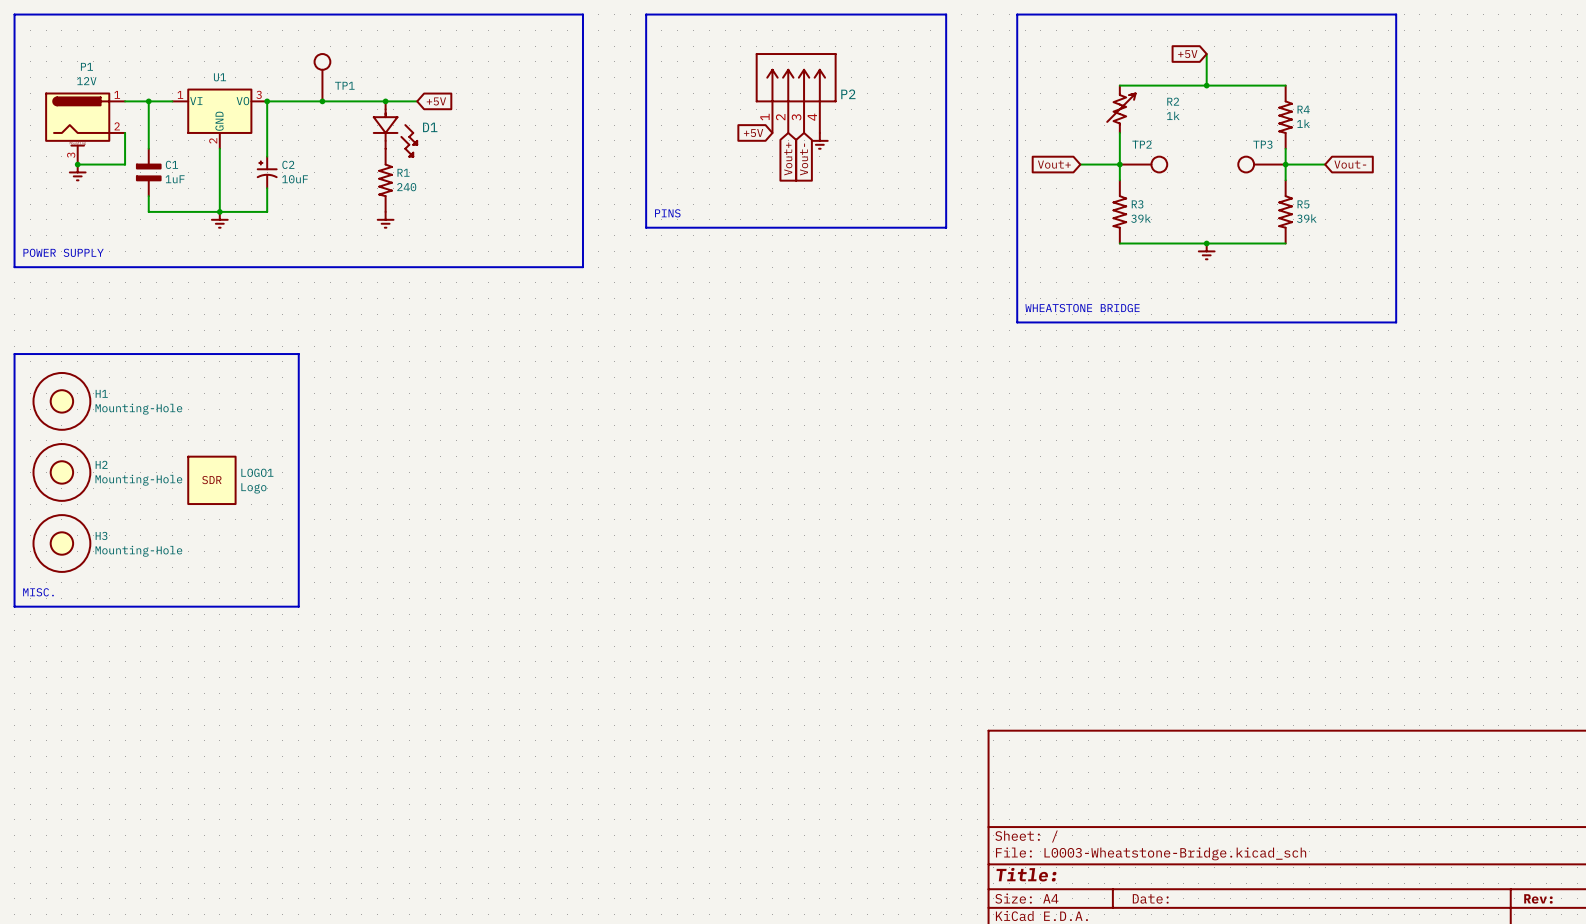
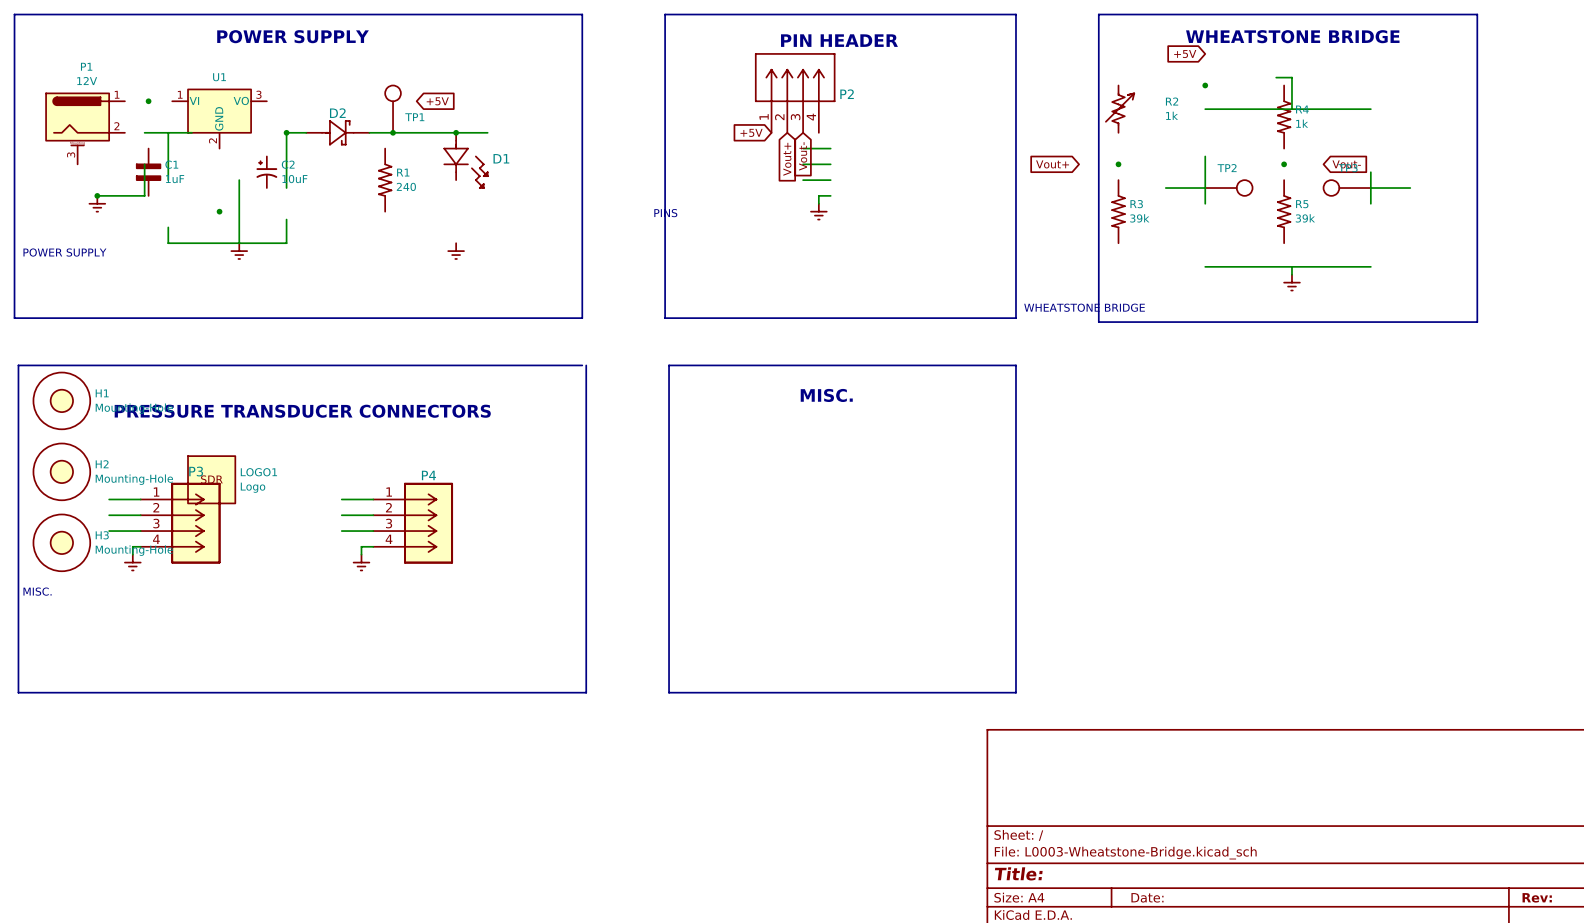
line: (665, 14) (646, 14) (646, 227) (946, 227) (946, 14) -> (665, 14) (665, 318) (1015, 318)
line: (1017, 14) (1100, 14) -> (1015, 14) (945, 14)
line: (1396, 14) (1396, 322) -> (1394, 14) (1477, 14) (1477, 322) (1394, 322)
text: none -> POWER SUPPLY (293, 36)
text: none -> WHEATSTONE BRIDGE (1292, 36)
text: none -> PIN HEADER (839, 40)
wire: (1206, 54) (1206, 85) -> none
part position: (322, 77) -> (393, 109)
wire: none -> (1276, 77) (1291, 77) (1291, 109)
wire: (1119, 85) (1285, 85) -> (1205, 109) (1370, 109)
wire: (125, 101) (172, 101) -> (144, 132) (191, 132)
wire: (148, 101) (148, 148) -> (168, 132) (168, 180)
junction: (267, 101) -> none
junction: (322, 101) -> none
junction position: (385, 101) -> (393, 132)
wire: (417, 101) (267, 101) (267, 156) -> none
D1 position: (395, 129) -> (465, 160)
wire: (125, 132) (125, 164) (77, 164) -> (144, 164) (144, 195) (97, 195)
junction: none -> (286, 132)
wire: none -> (306, 132) (286, 132) (286, 188)
D2: none -> (337, 132)
wire: none -> (369, 132) (487, 132)
junction: none -> (456, 132)
wire: (1119, 132) (1119, 180) -> (1205, 156) (1205, 203)
power symbol position: (819, 140) -> (818, 211)
wire: (219, 148) (219, 211) -> (239, 180) (239, 243)
wire: none -> (803, 148) (830, 148)
wire: (1285, 148) (1285, 180) -> (1370, 172) (1370, 203)
junction position: (77, 164) -> (97, 195)
wire: none -> (803, 164) (830, 164)
wire: (1080, 164) (1119, 164) -> (1165, 188) (1205, 188)
part position: (1143, 164) -> (1228, 188)
part position: (1261, 164) -> (1347, 188)
wire: (1285, 164) (1325, 164) -> (1370, 188) (1410, 188)
power symbol position: (77, 172) -> (97, 203)
wire: none -> (803, 180) (830, 180)
wire: (267, 188) (267, 211) (148, 211) (148, 196) -> (286, 219) (286, 243) (168, 243) (168, 227)
wire: none -> (830, 195) (818, 195) (818, 203)
power symbol position: (219, 219) -> (239, 251)
power symbol: (385, 219) -> none
wire: (1119, 243) (1285, 243) -> (1205, 266) (1370, 266)
junction: (1206, 243) -> none
power symbol: none -> (456, 251)
power symbol position: (1206, 251) -> (1291, 282)
line: (14, 267) (582, 267) -> (14, 266) (14, 318) (582, 318) (582, 266)
wire: none -> (1291, 266) (1291, 274)
line: (1017, 318) (1017, 322) (1100, 322) -> (1098, 14) (1098, 322)
line: (14, 354) (298, 354) (298, 606) (14, 606) (14, 354) -> none
line: none -> (582, 365) (18, 365) (18, 692) (586, 692) (586, 365)
line: none -> (669, 365) (1015, 365) (1015, 692) (669, 692) (669, 365)
text: none -> MISC. (826, 395)
text: none -> PRESSURE TRANSDUCER CONNECTORS (302, 411)
wire: none -> (109, 499) (140, 499)
wire: none -> (341, 499) (373, 499)
wire: none -> (109, 515) (140, 515)
wire: none -> (341, 515) (373, 515)
P3: none -> (180, 523)
P4: none -> (412, 523)
wire: none -> (109, 531) (140, 531)
wire: none -> (341, 531) (373, 531)
wire: none -> (140, 546) (132, 546) (132, 554)
wire: none -> (373, 546) (361, 546) (361, 554)
power symbol: none -> (132, 562)
power symbol: none -> (361, 562)

